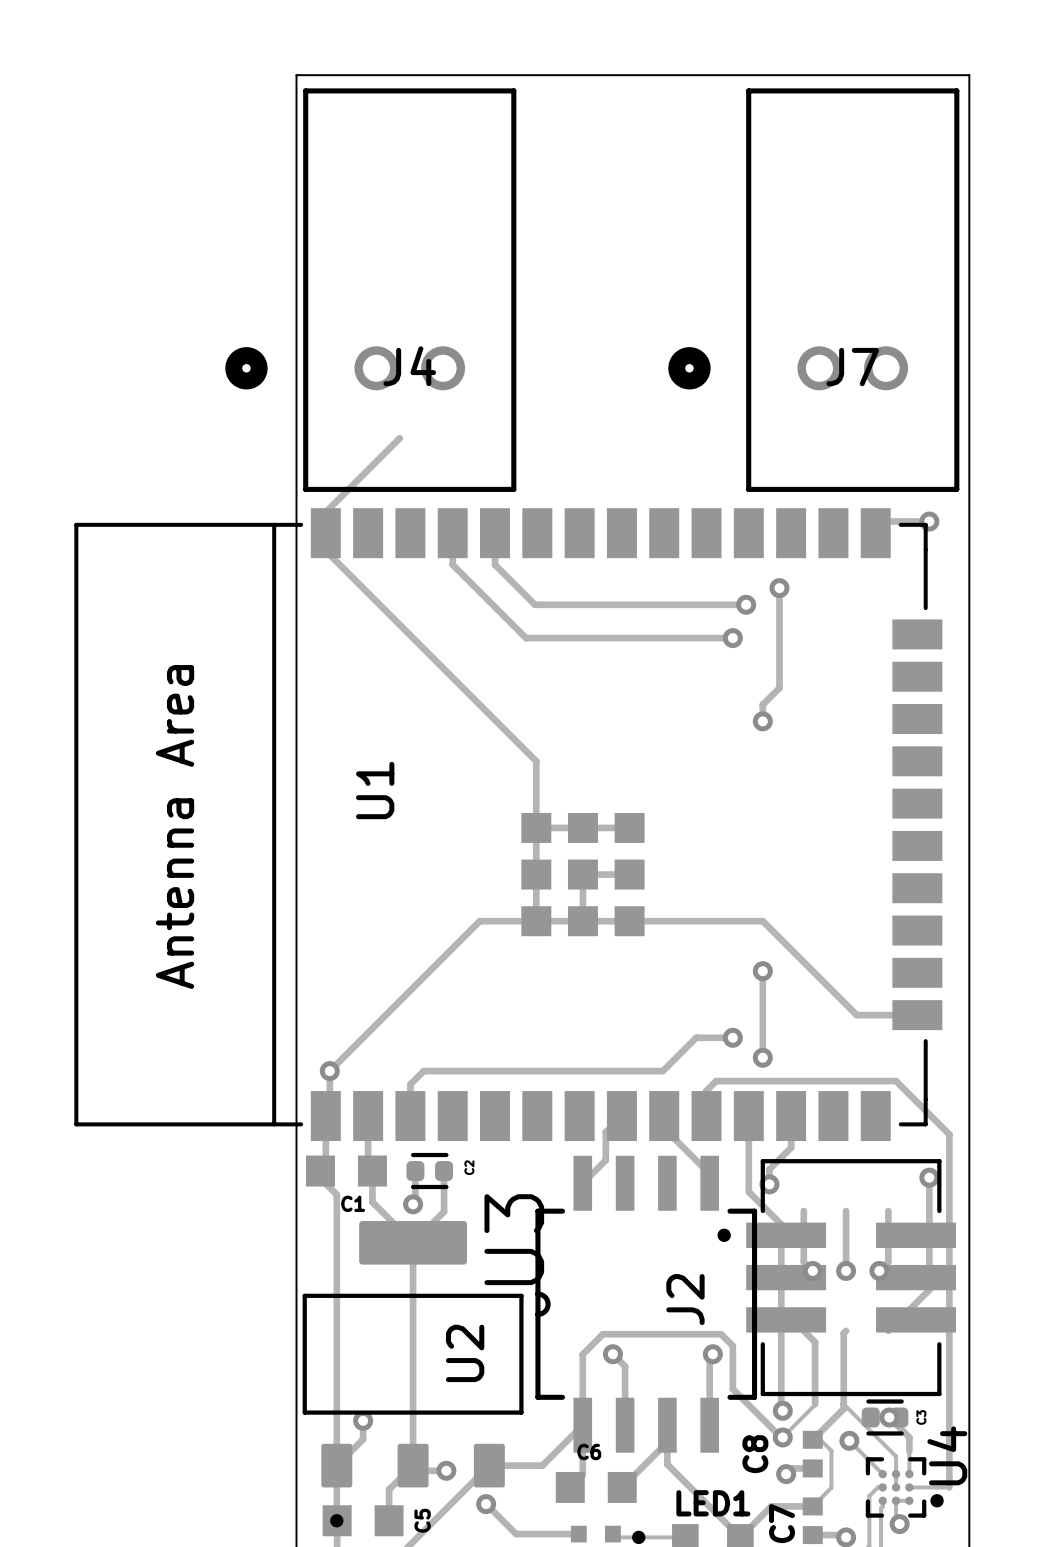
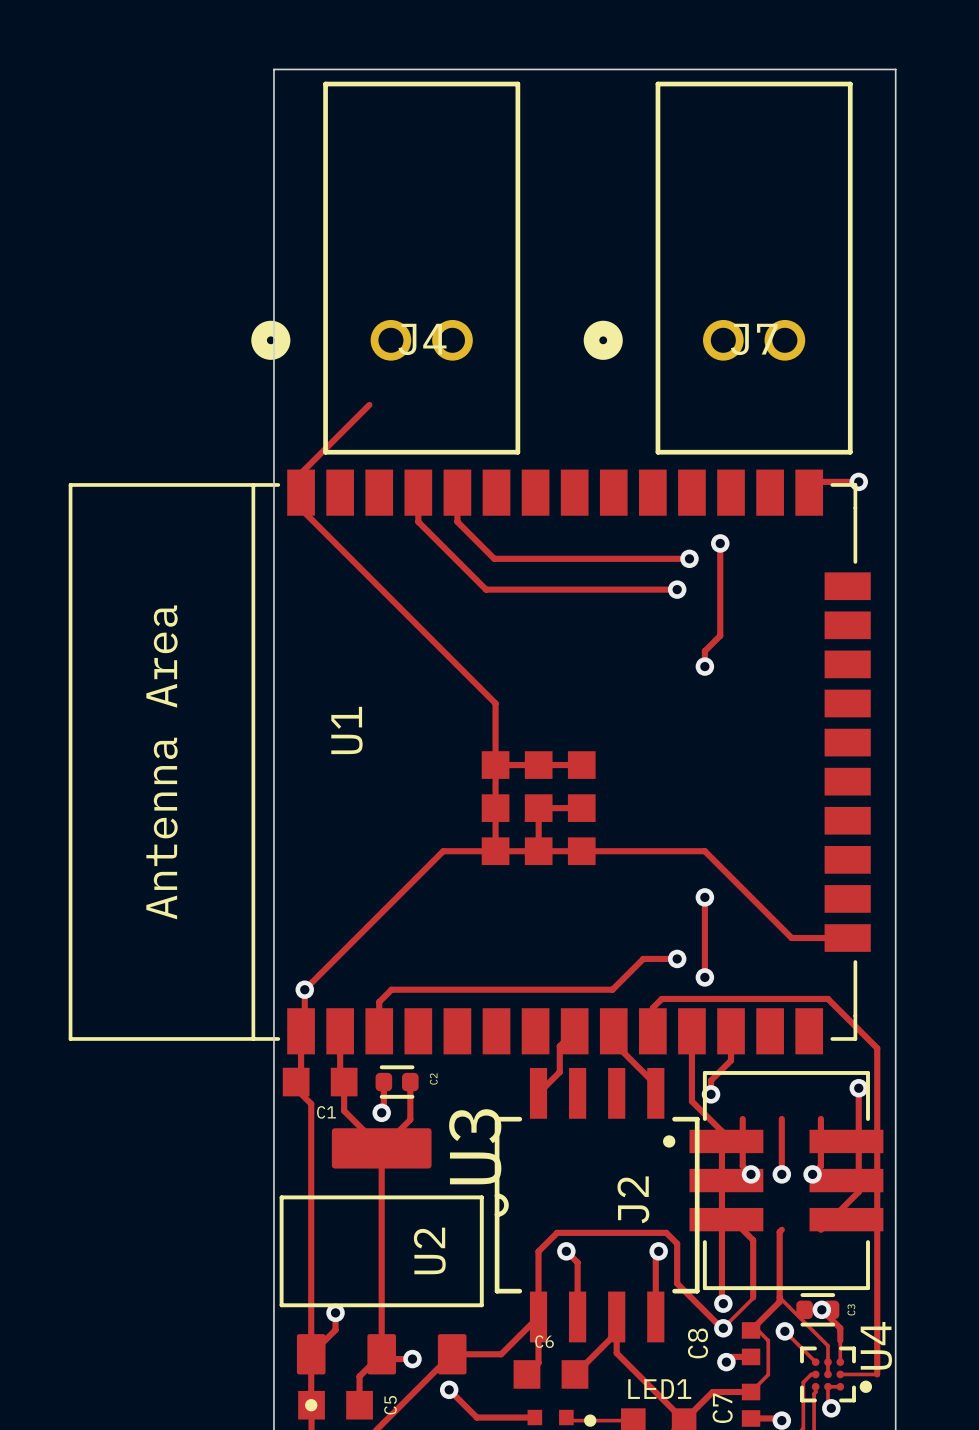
J4 position: (370, 290) -> (385, 268)
J7 position: (813, 290) -> (718, 268)

